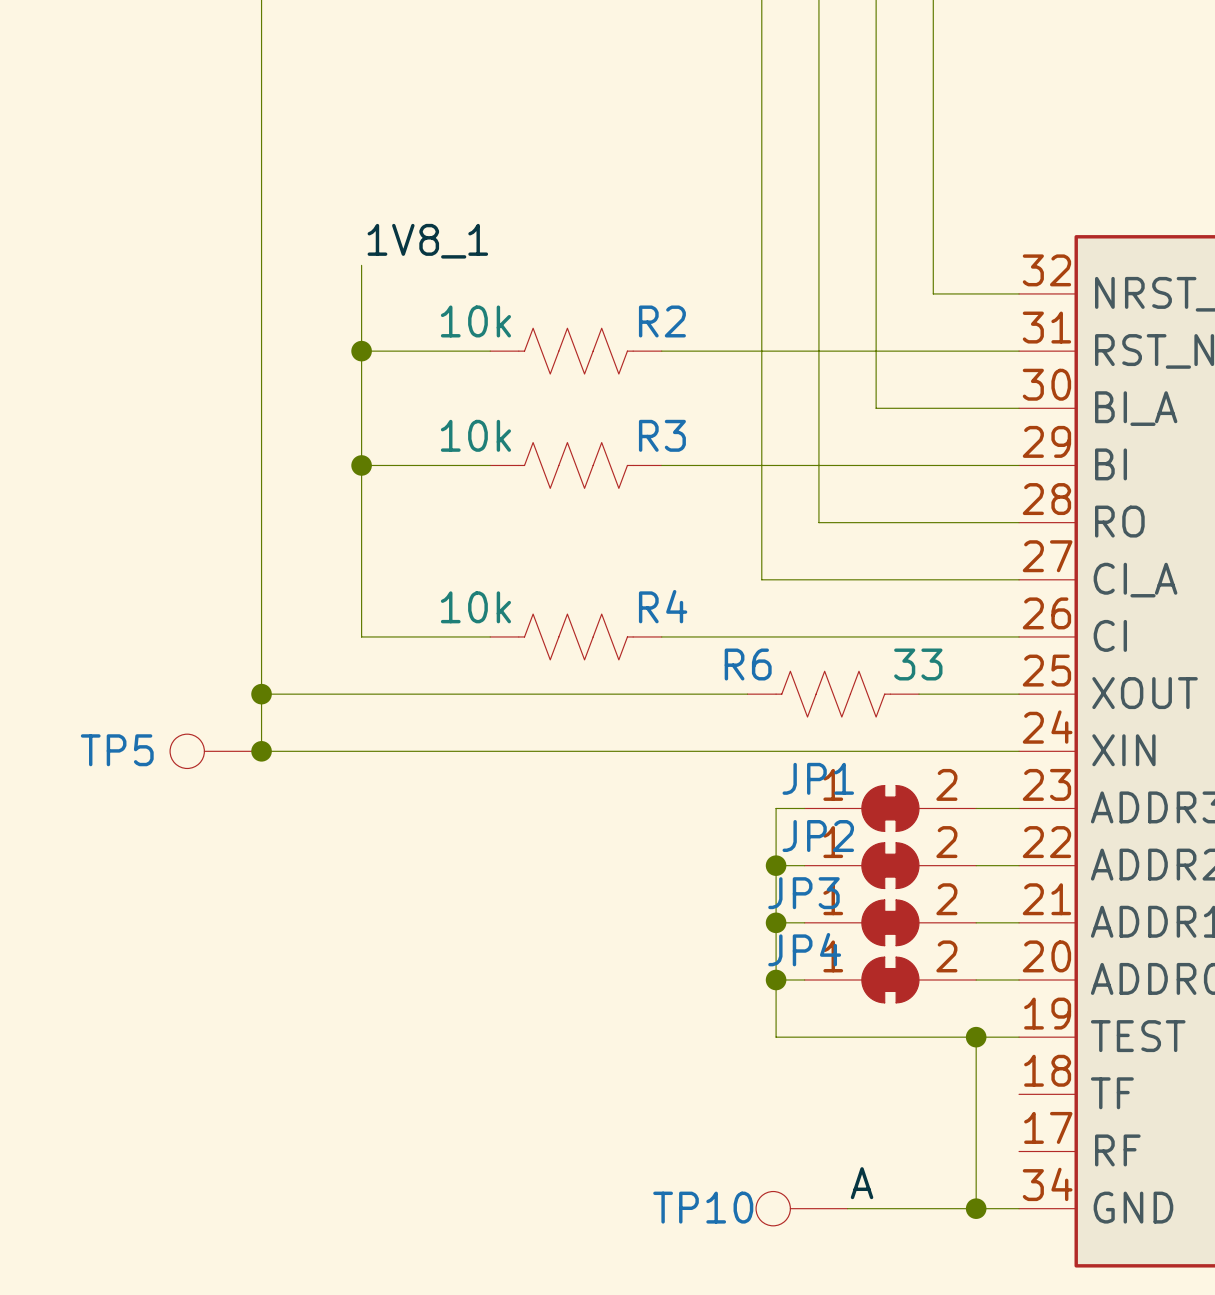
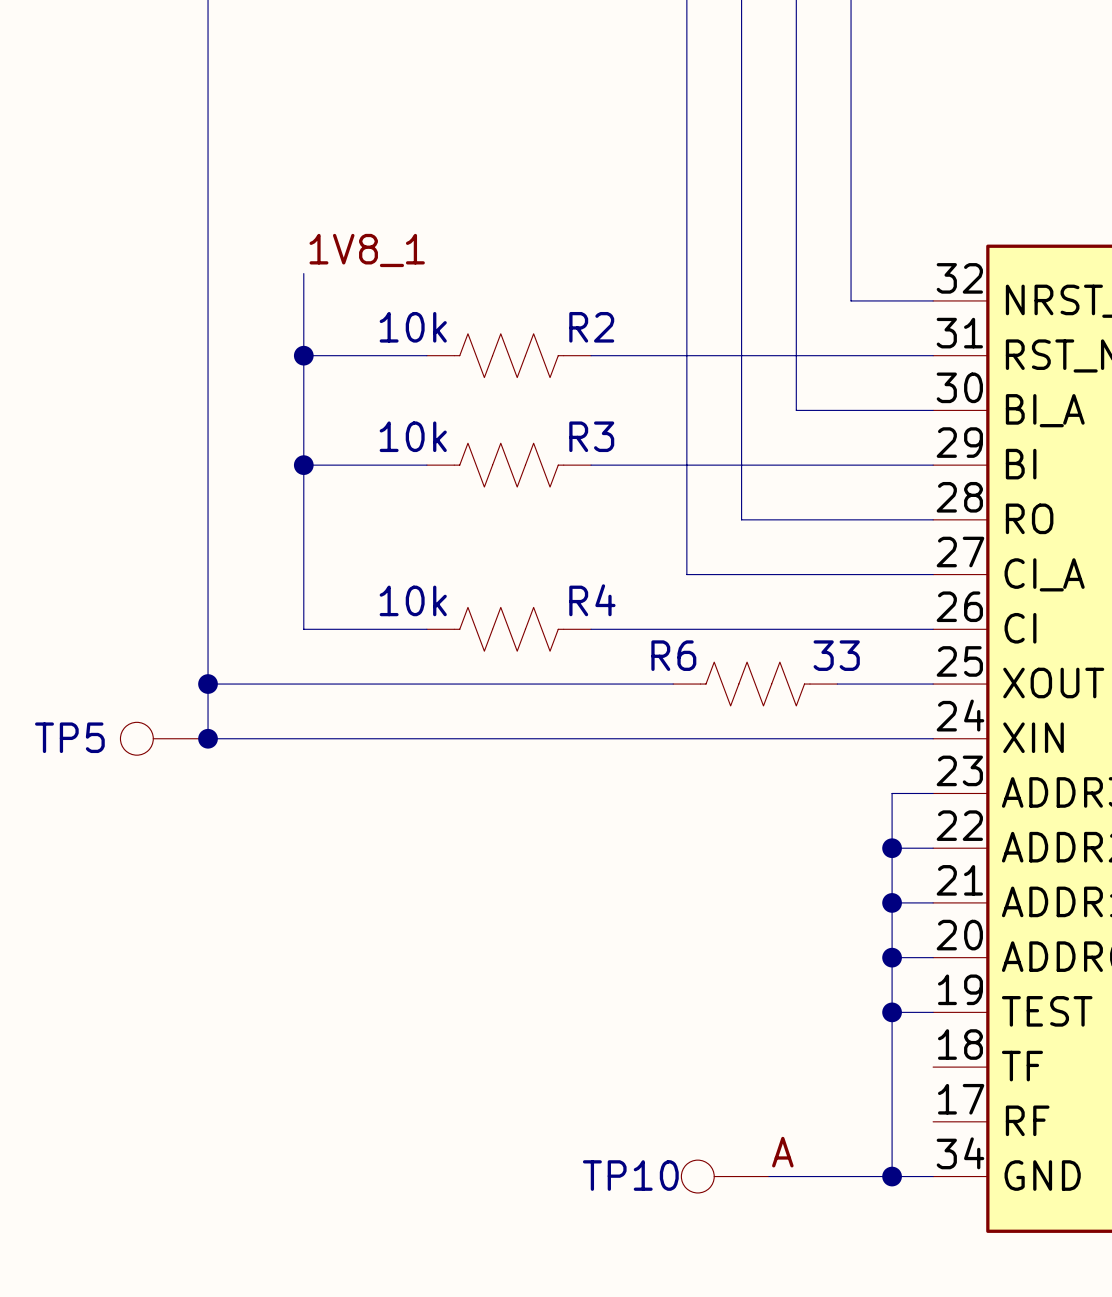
wire: (804, 808) (776, 808) (776, 1037) (976, 1037) -> (892, 793) (892, 1012)
JP1: (890, 808) -> none
wire: (776, 865) (804, 865) -> none
junction: (776, 865) -> none
JP2: (890, 865) -> none
junction: none -> (892, 848)
wire: (776, 922) (804, 922) -> none
junction: (776, 922) -> none
JP3: (890, 922) -> none
junction: none -> (892, 902)
wire: (776, 979) (804, 979) -> none
junction: (776, 979) -> none
JP4: (890, 979) -> none
junction: none -> (892, 957)

